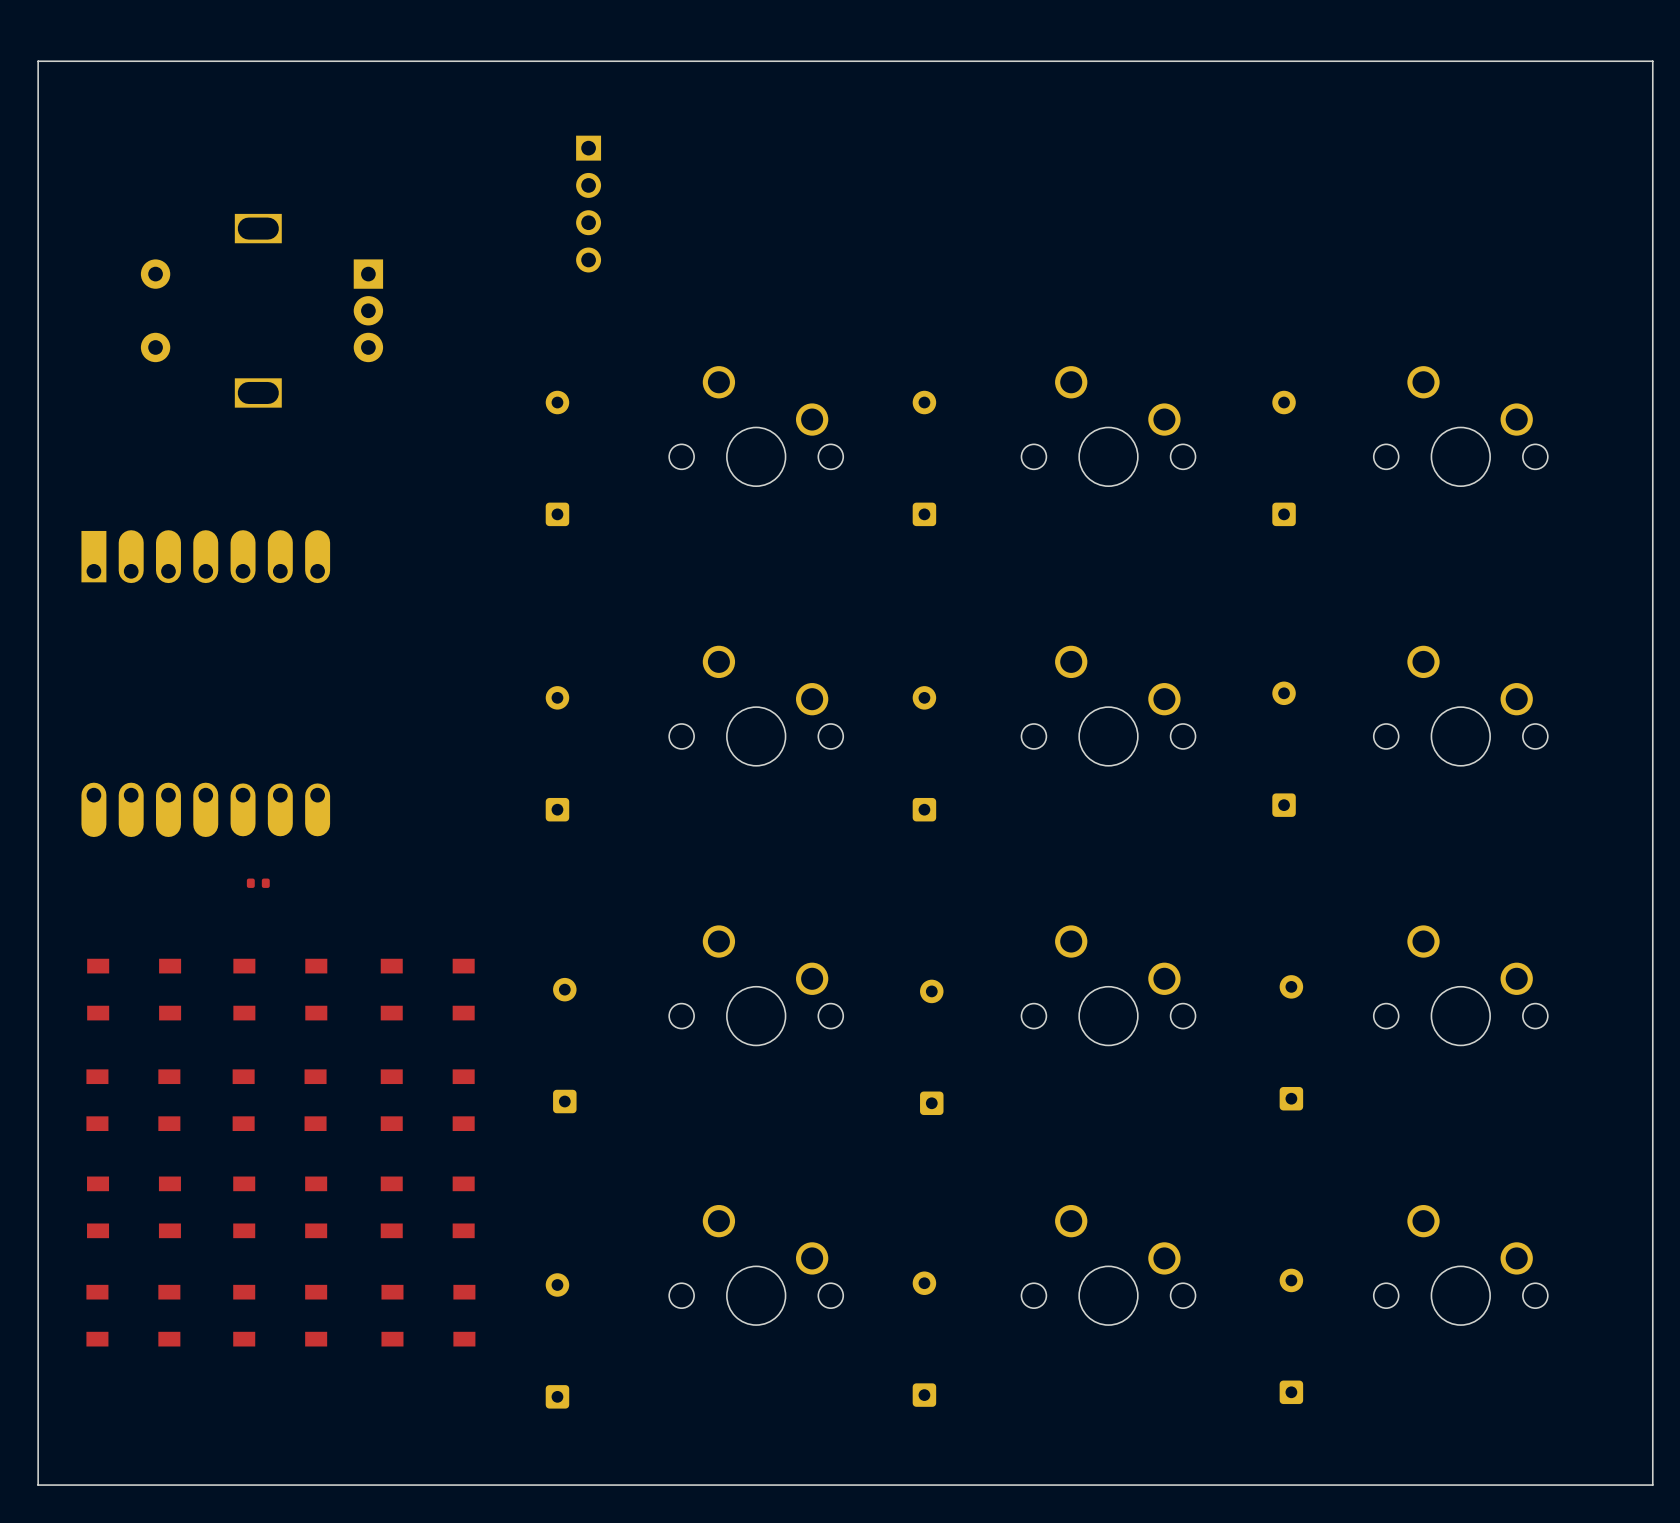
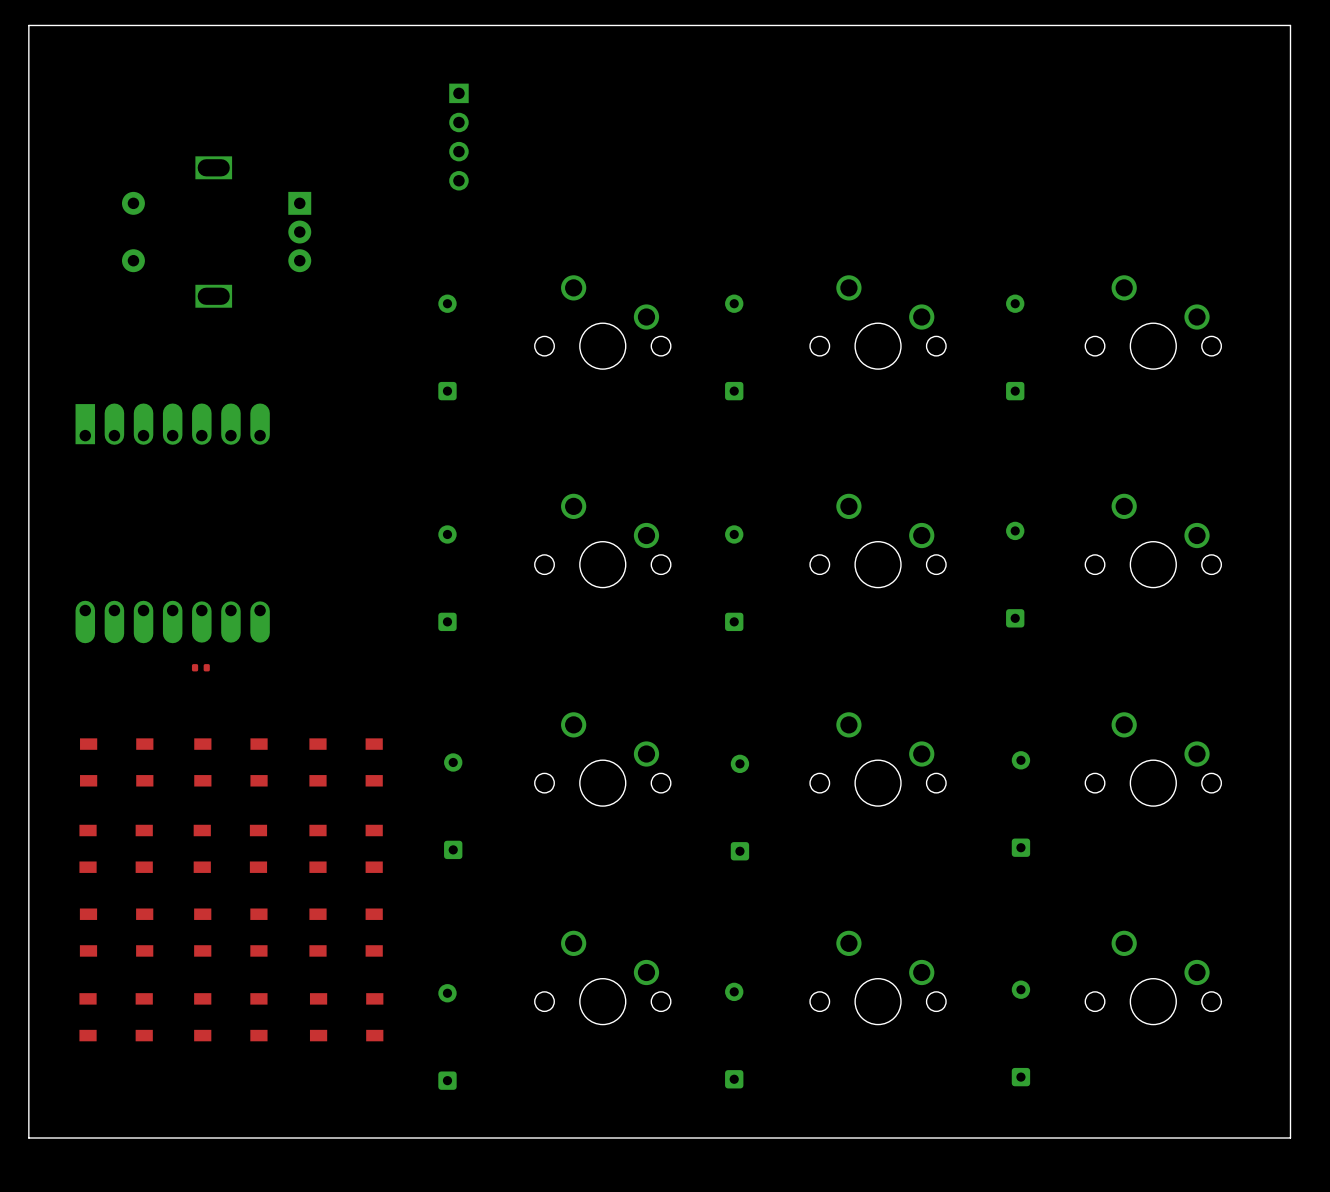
board edge: (1652, 61) (38, 61) (38, 1485) (1652, 1485) (1652, 61) -> (1290, 25) (28, 25) (28, 1138) (1290, 1138) (1290, 25)
part position: (588, 204) -> (458, 137)
part position: (258, 883) -> (200, 667)

